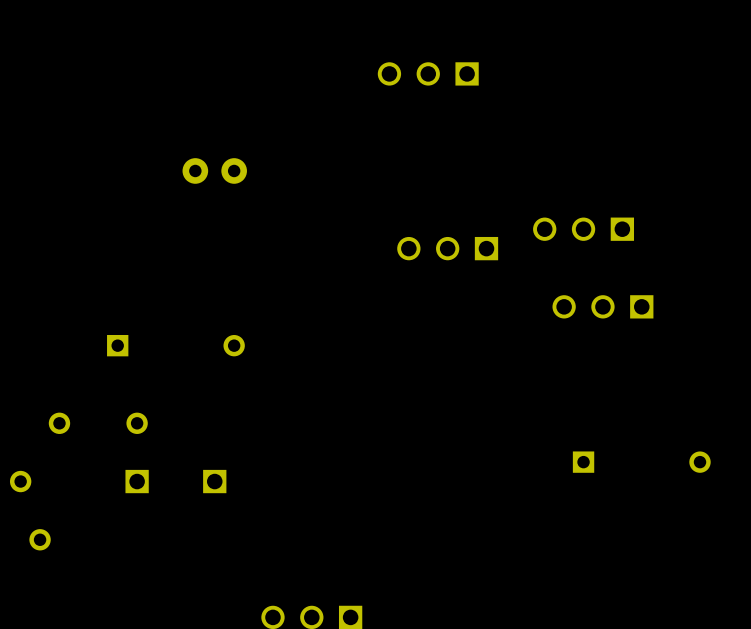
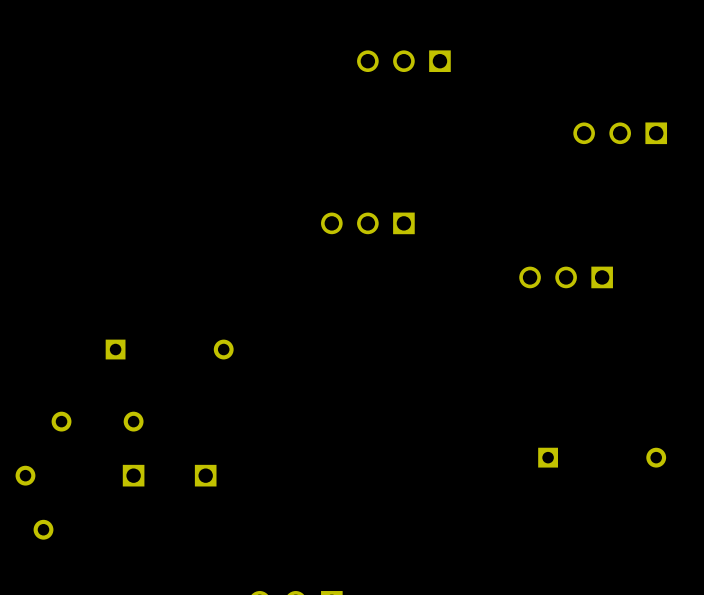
part position: (428, 73) -> (403, 61)
part: none -> (620, 133)
part: (214, 170) -> none
part: (583, 229) -> none
part position: (447, 248) -> (367, 223)
part: none -> (566, 277)
part: (602, 306) -> none

